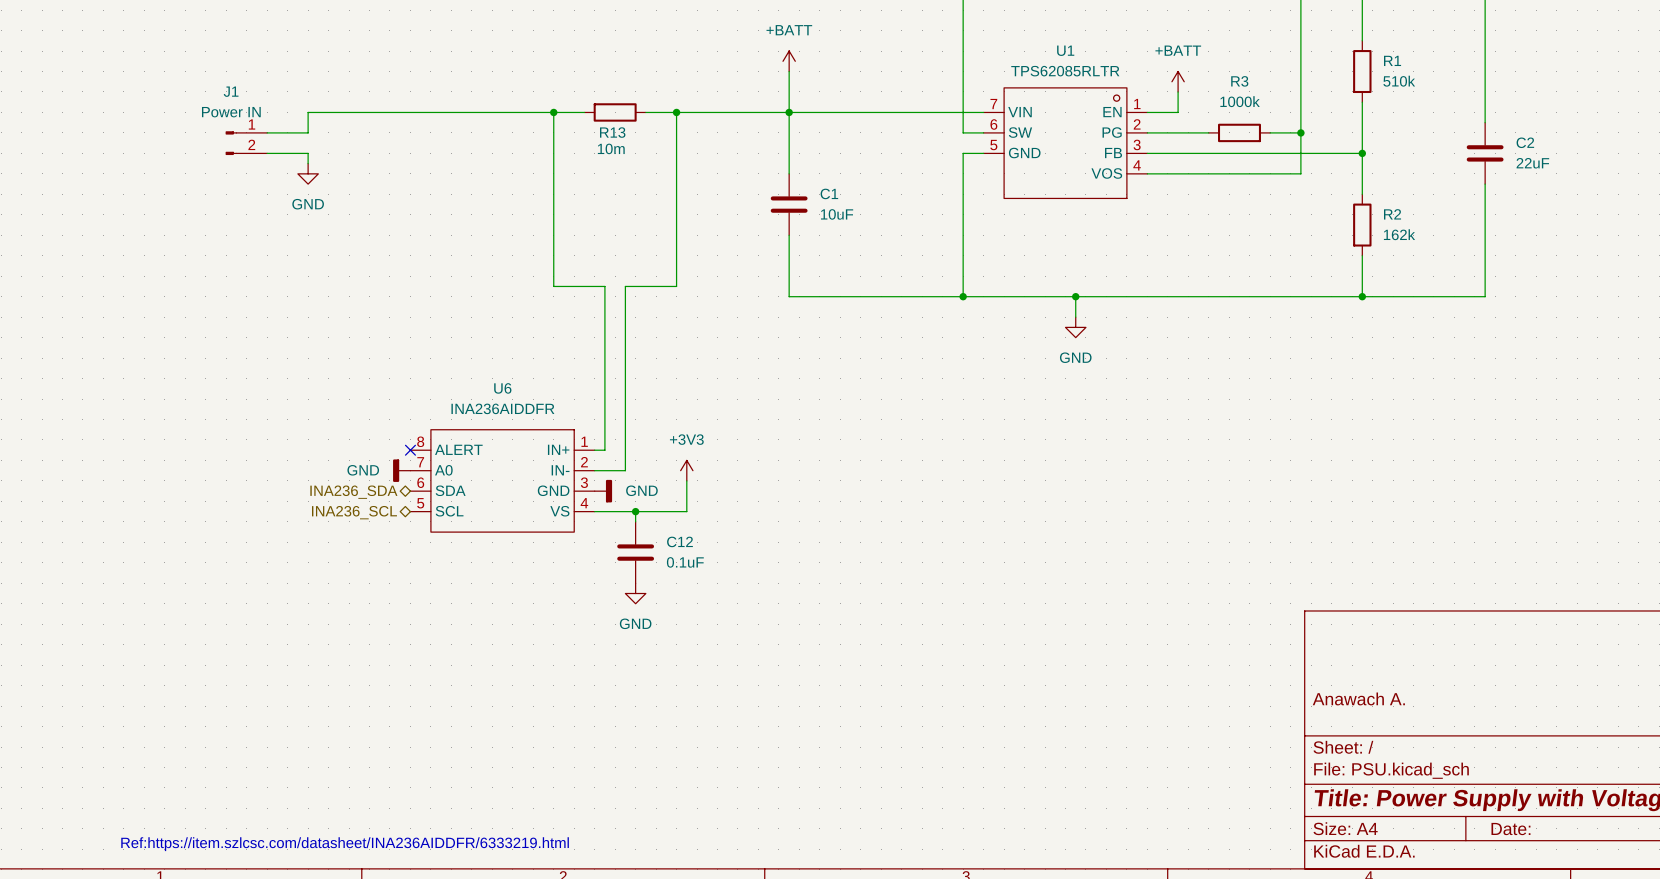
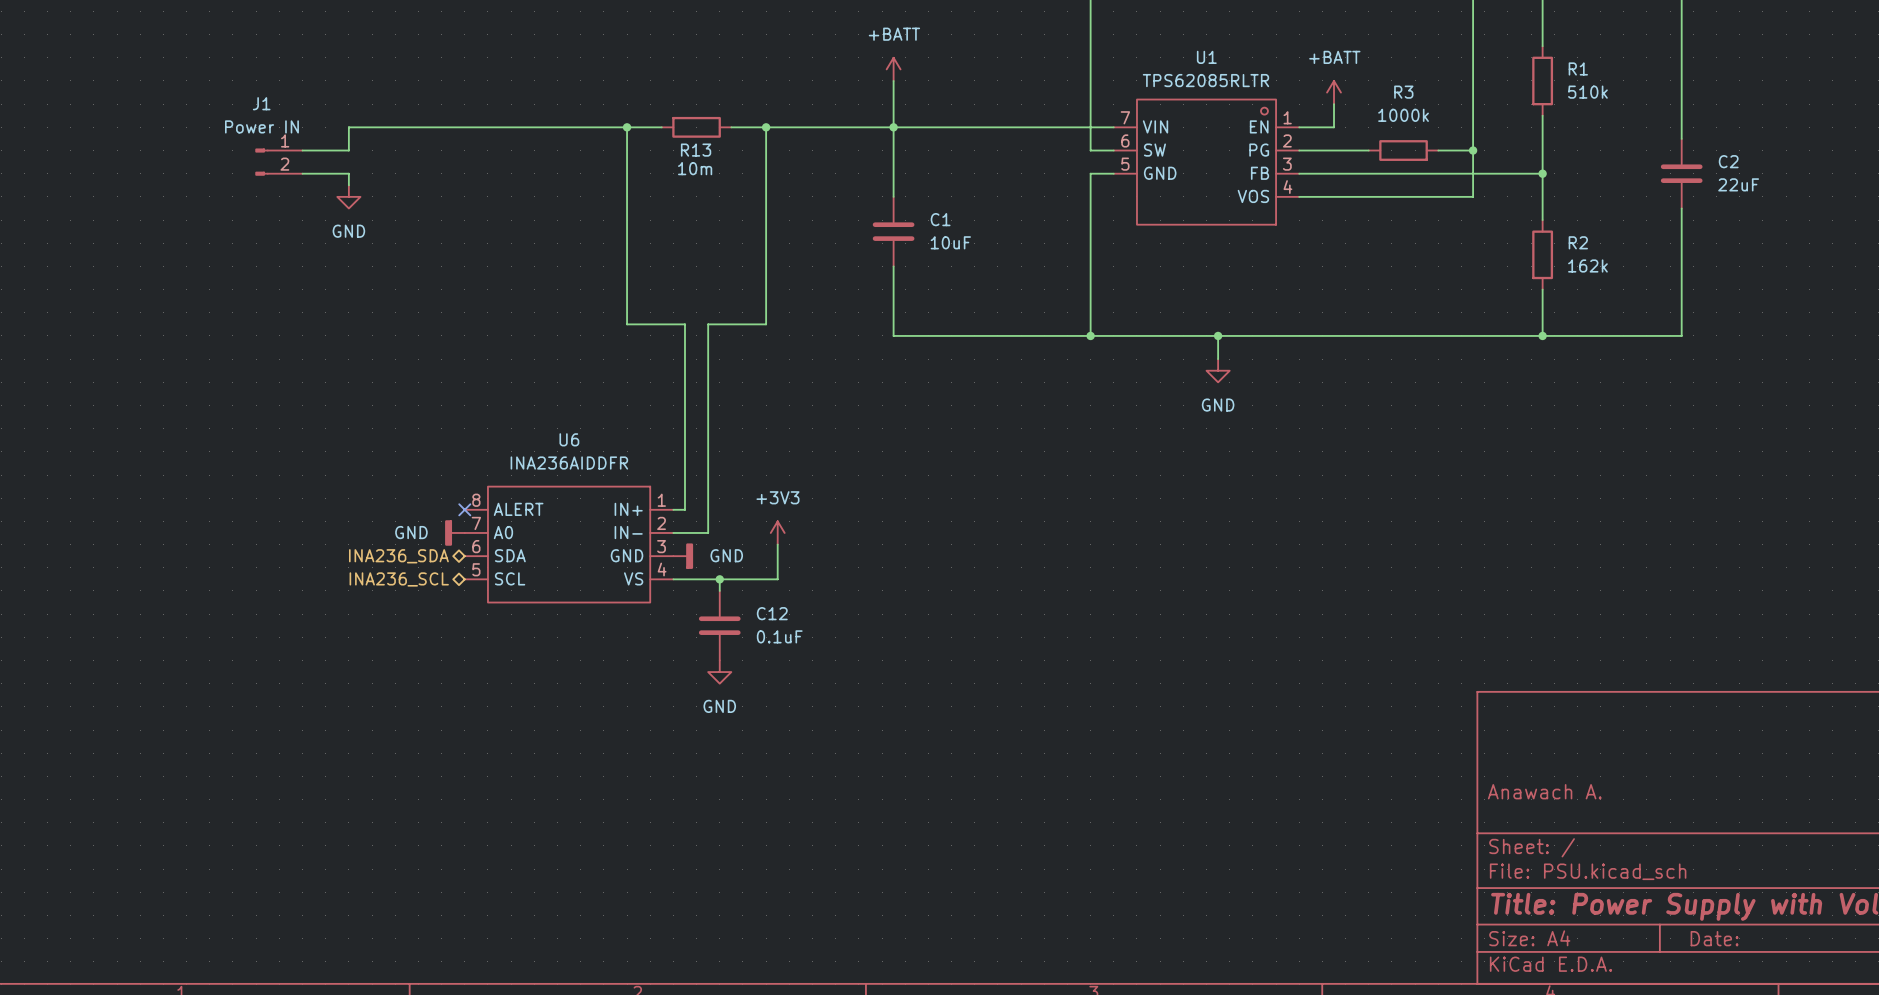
text: Ref:https://item.szlcsc.com/datasheet/INA236AIDDFR/6333219.html (345, 844) -> none

